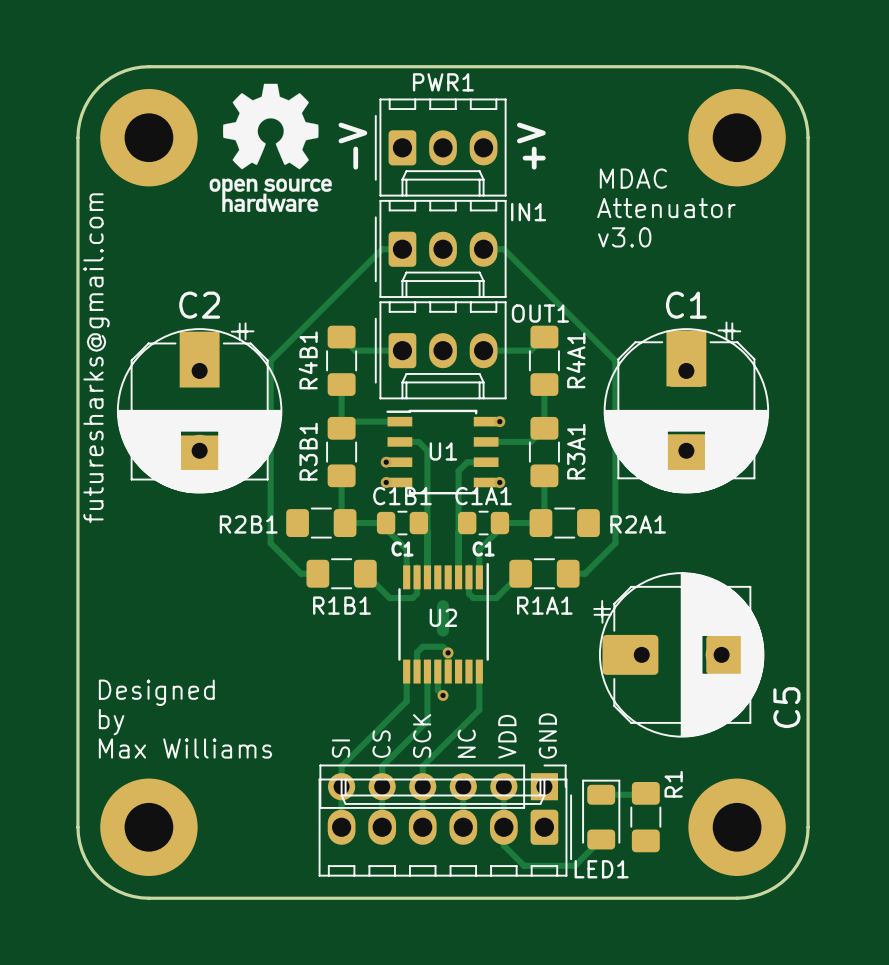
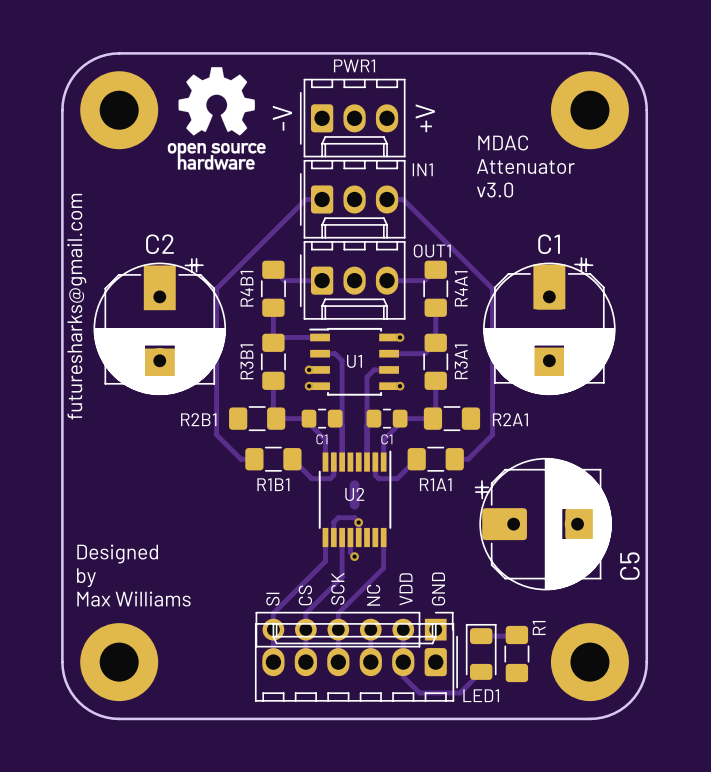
C1B1 name: C1B1 (402, 496) -> none
C1A1 name: C1A1 (483, 496) -> none

